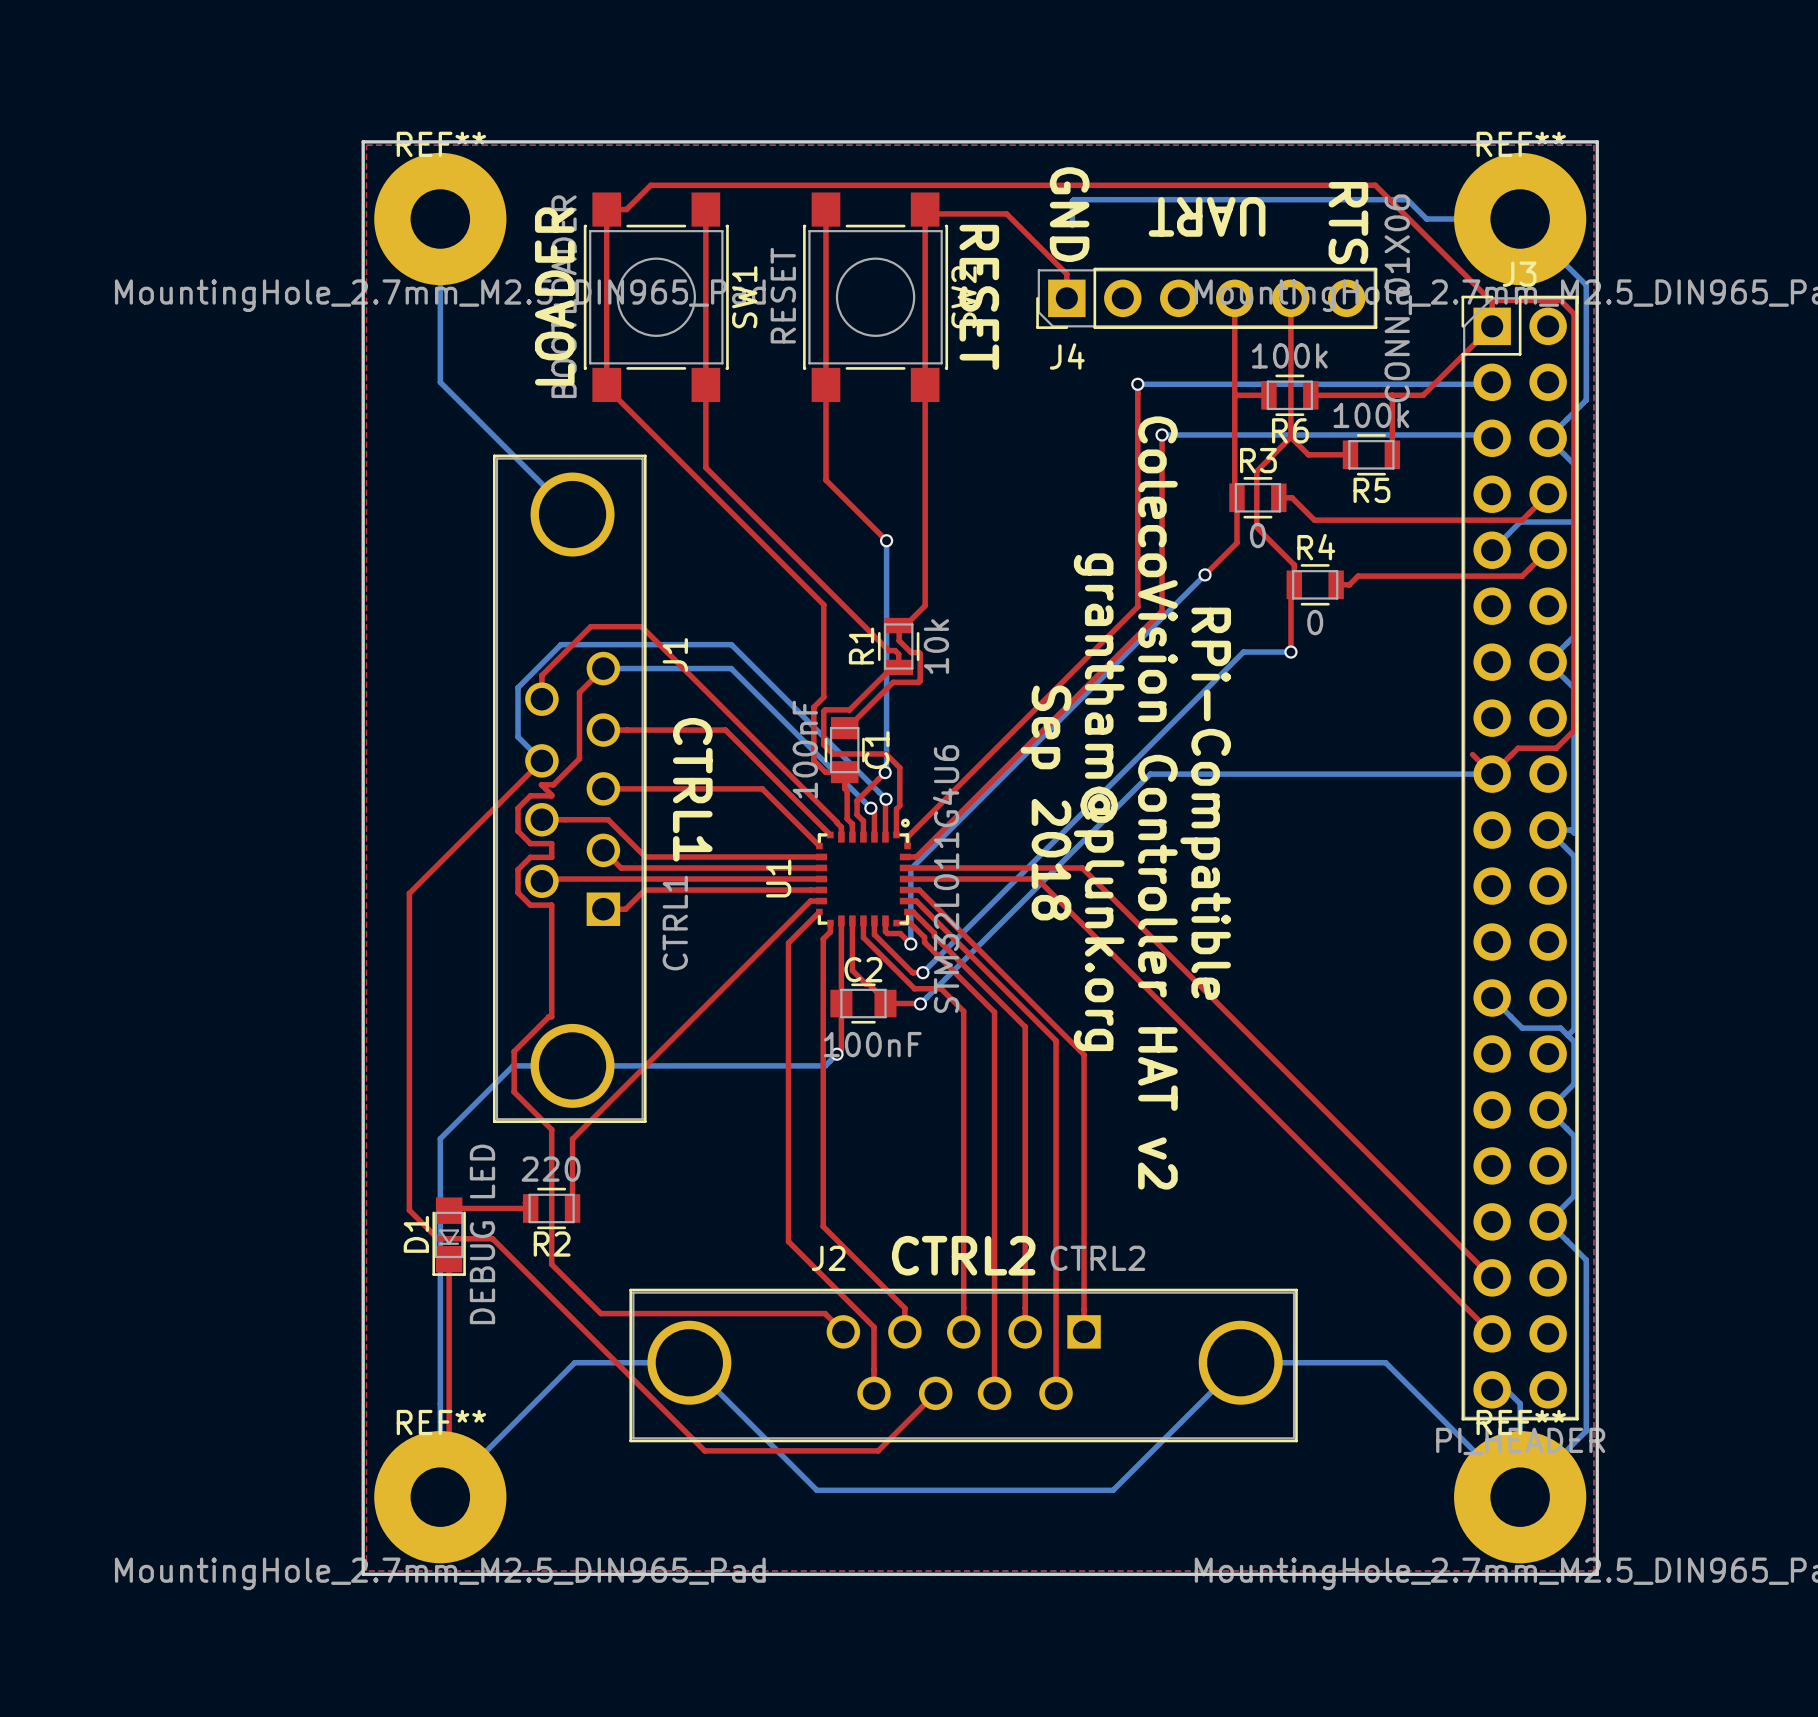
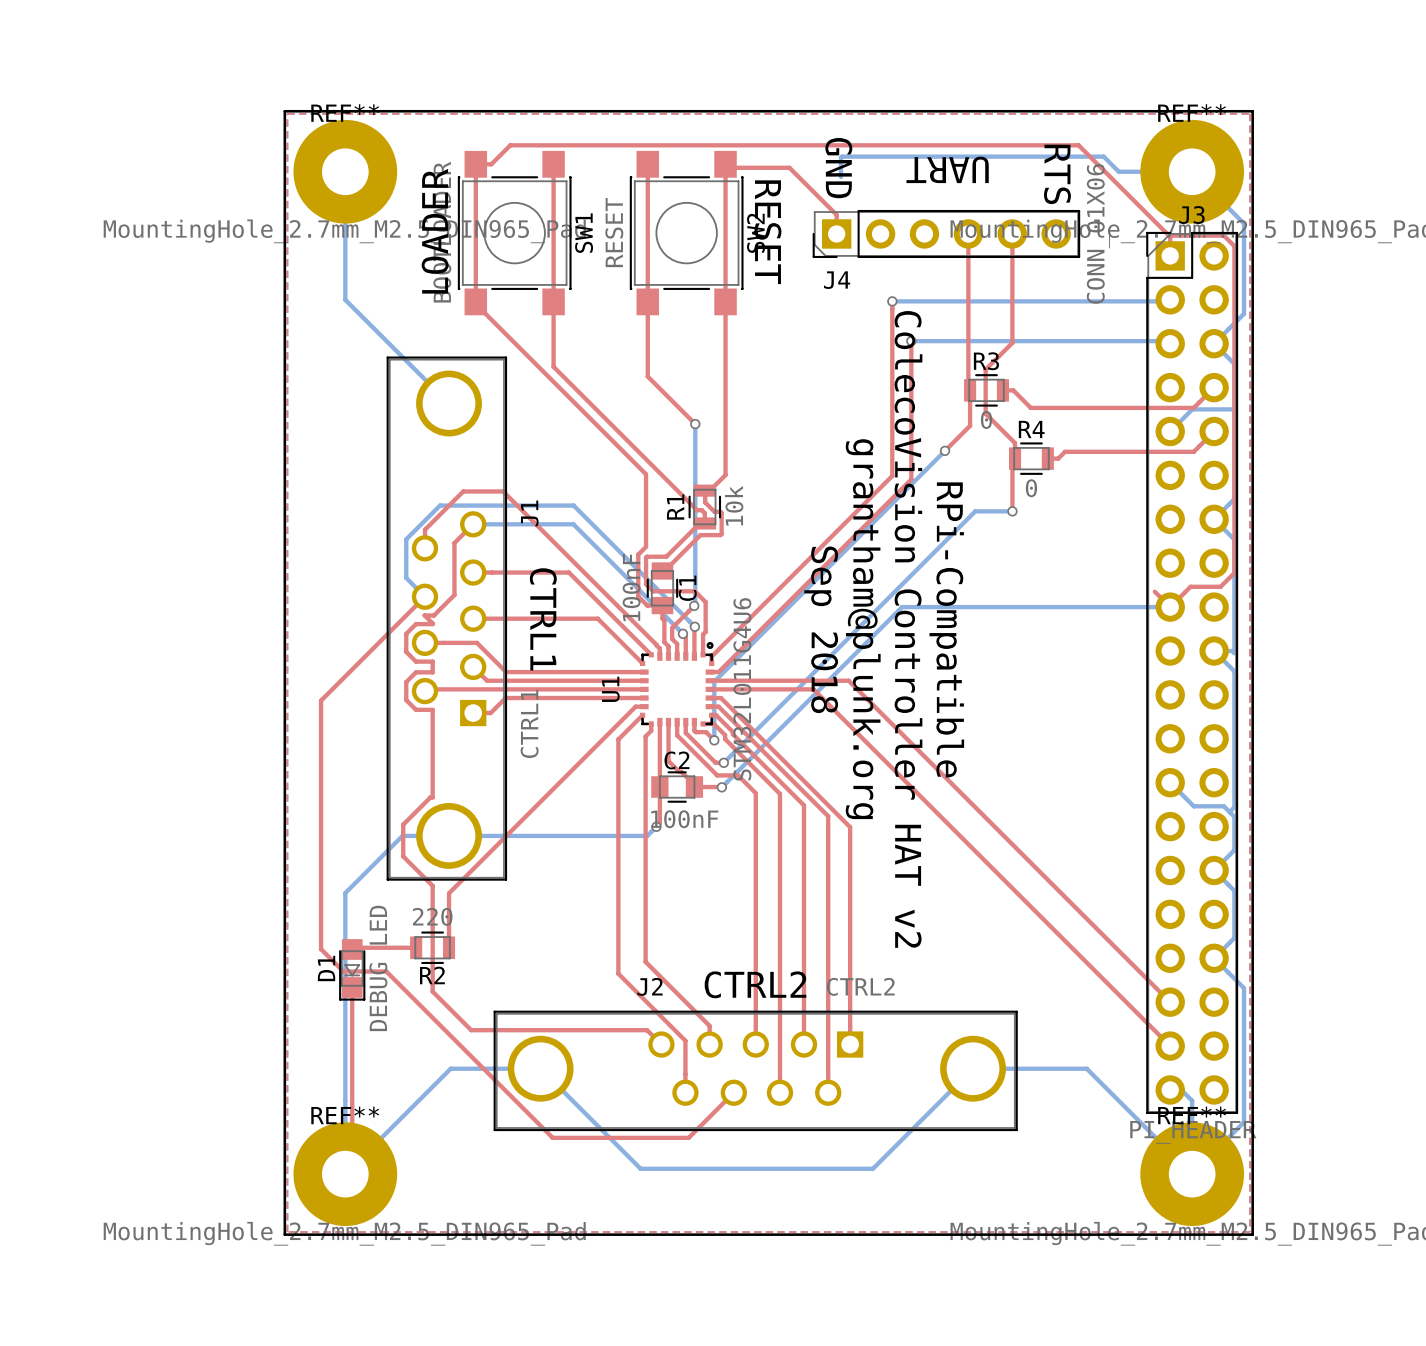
top track: (1492, 326) (1423, 395) (1310, 395) -> none
top track: (1268, 395) (1236, 395) (1234, 397) -> none
R6: 100k (1289, 395) -> none
top track: (1392, 395) (1392, 454) -> none
top track: (1290, 437) (1308, 454) (1350, 454) -> none
R5: 100k (1371, 454) -> none

